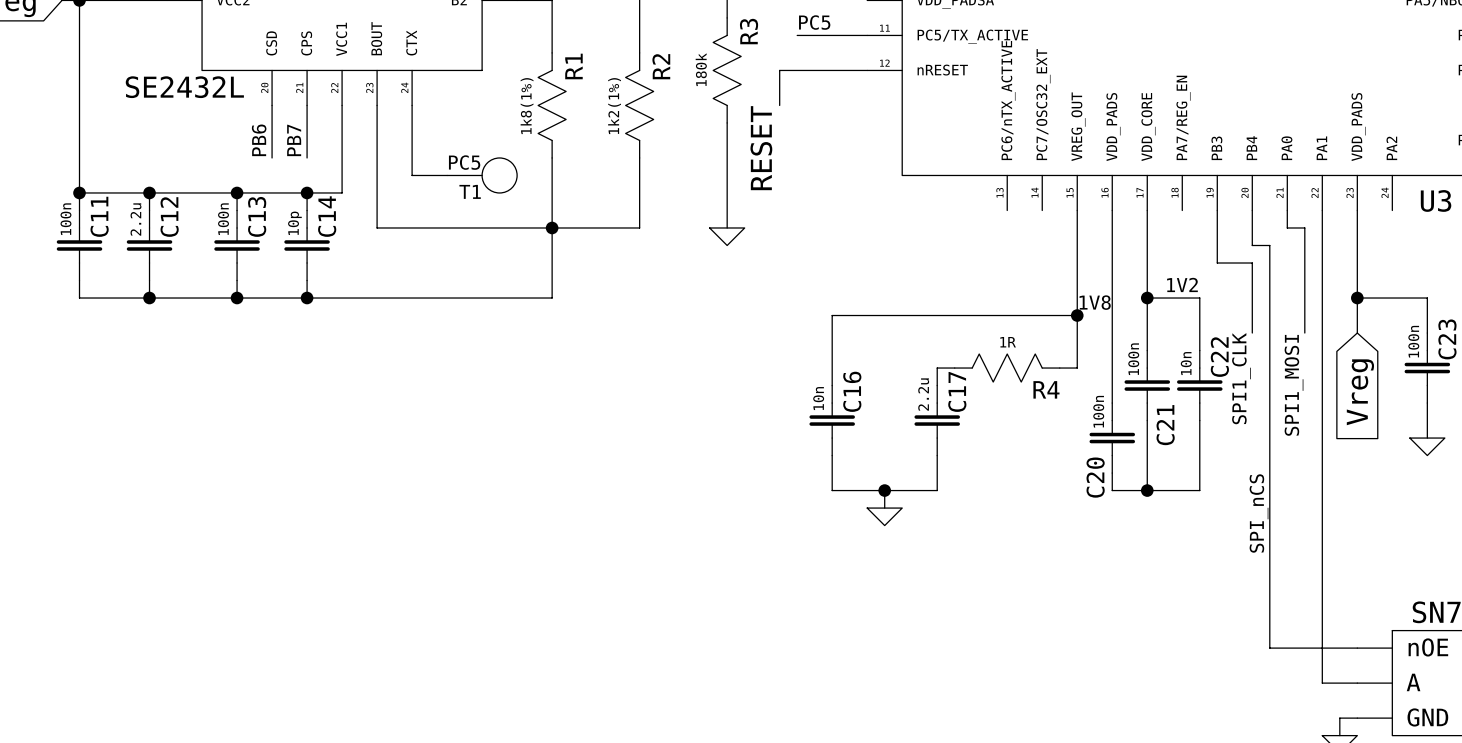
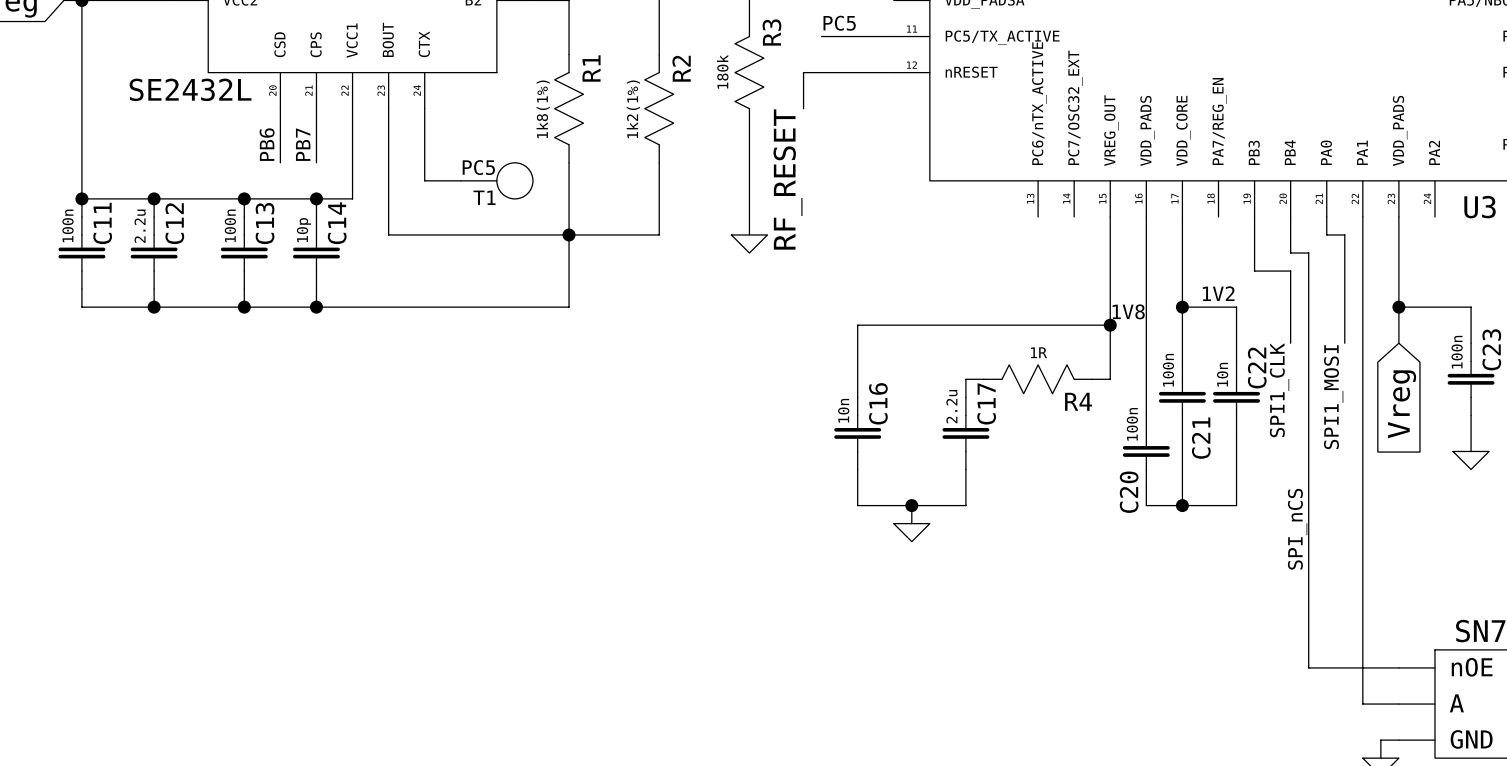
label: RESET (761, 148) -> RF_RESET (787, 179)

